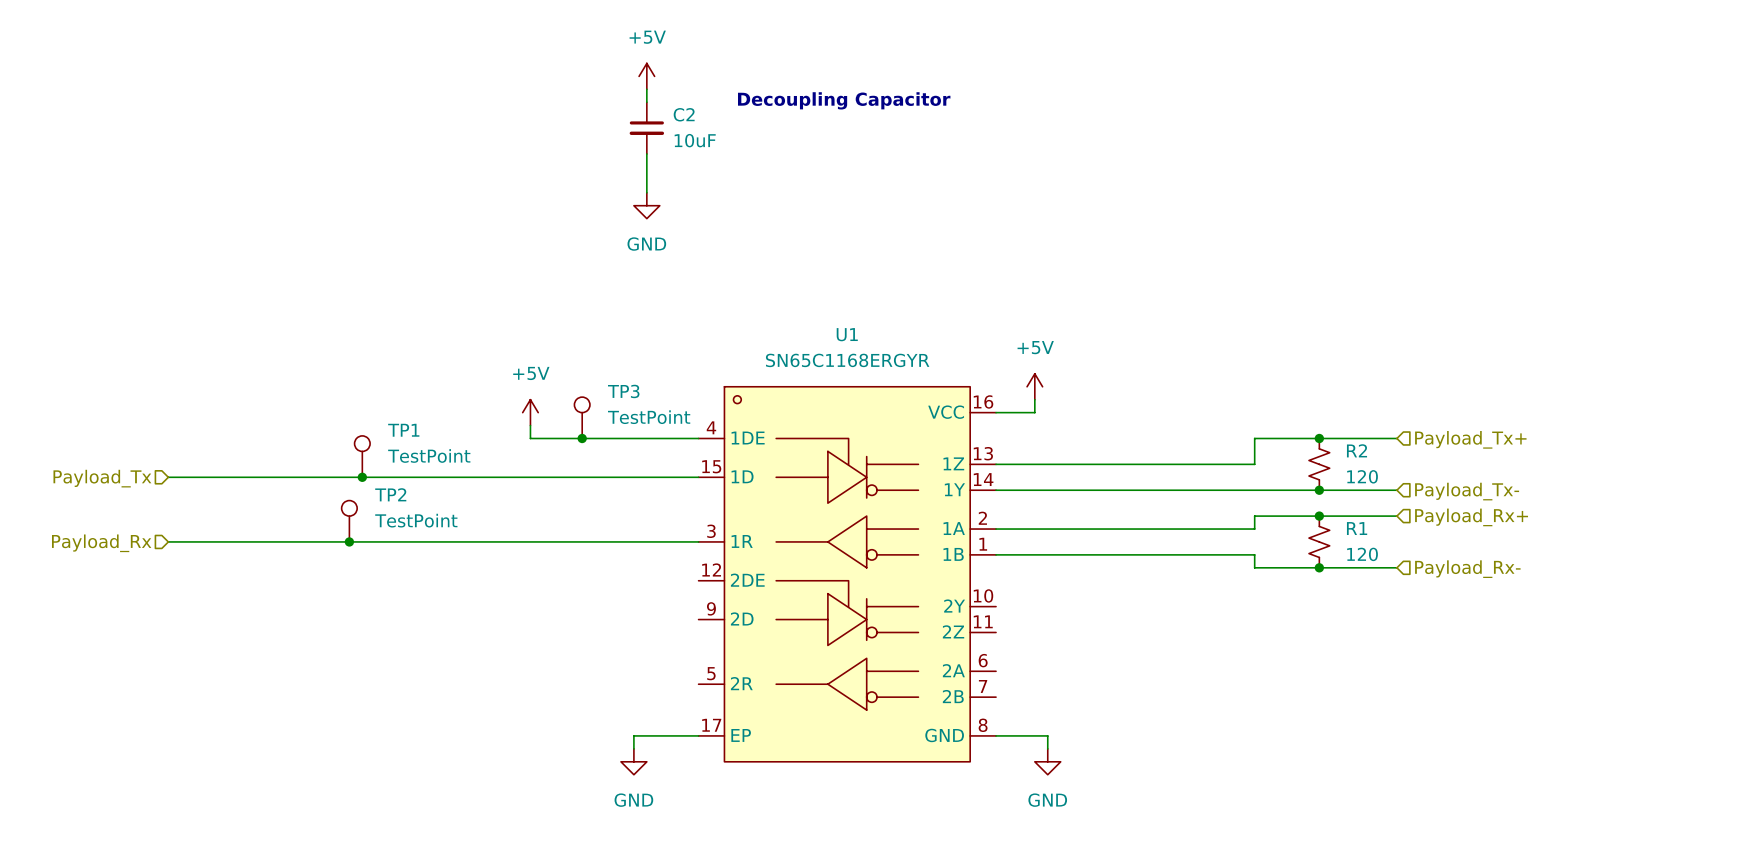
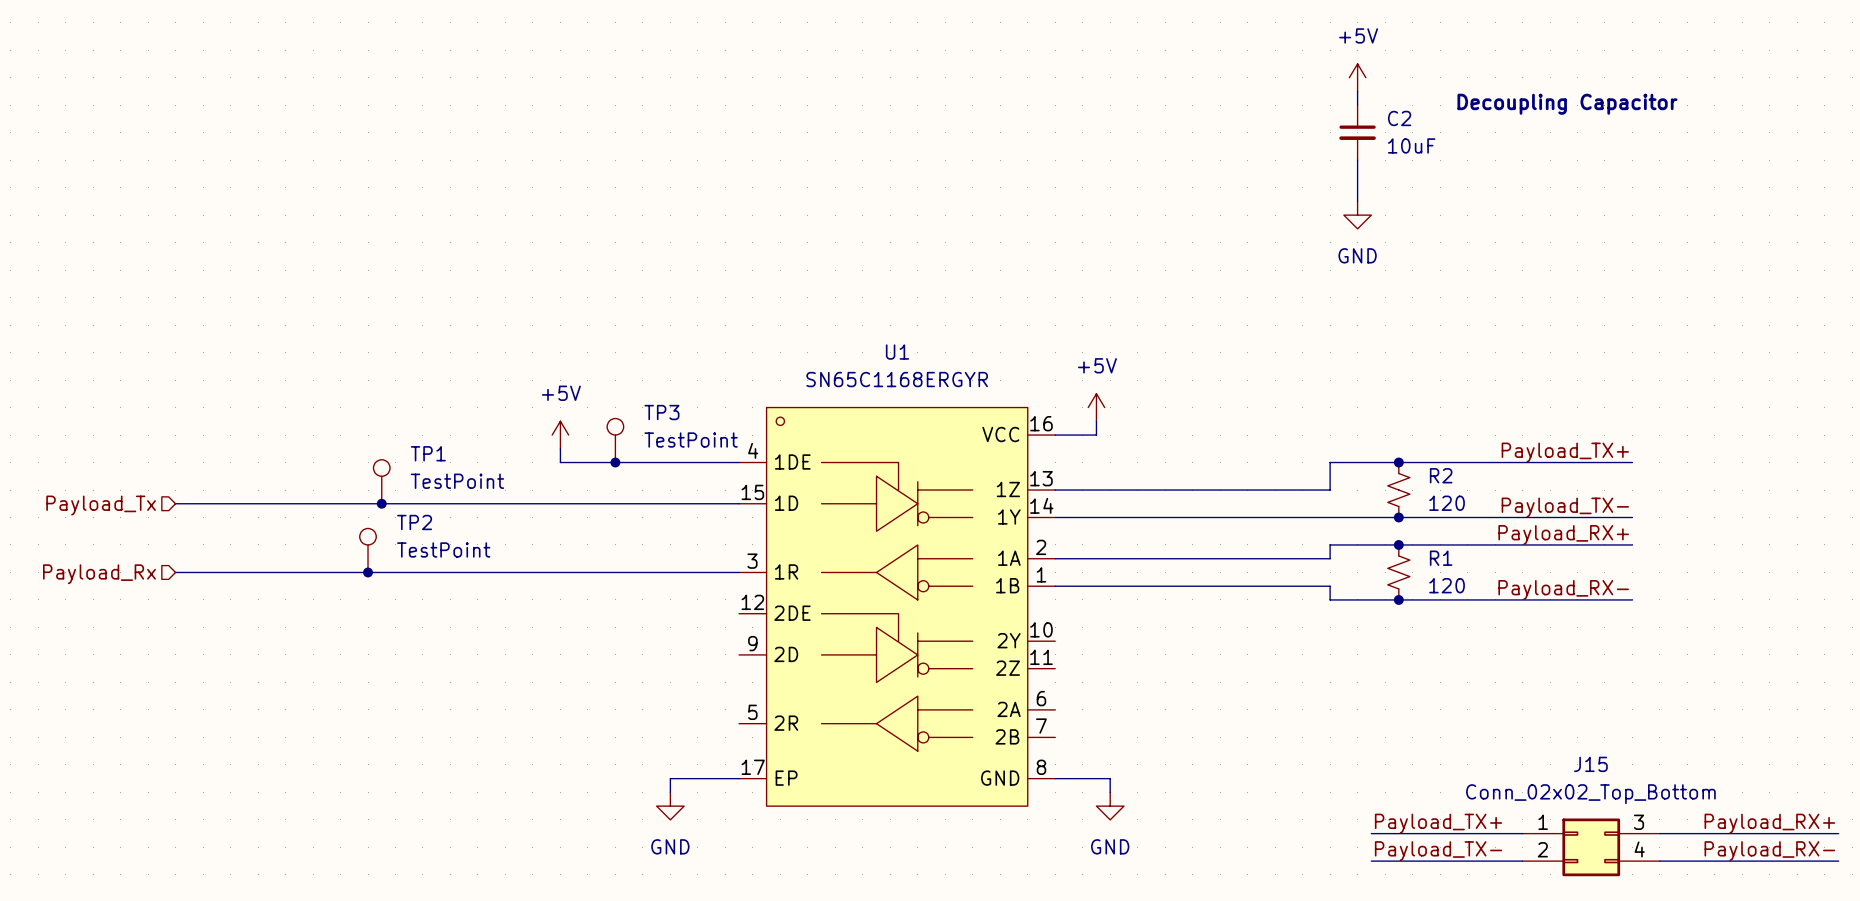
power symbol: +5V (646, 76) -> none
power symbol: none -> +5V (1357, 77)
wire: (646, 89) (646, 102) -> none
wire: none -> (1357, 91) (1357, 105)
text: Decoupling Capacitor (844, 100) -> none
text: none -> Decoupling Capacitor (1567, 104)
C2 position: (646, 128) -> (1357, 132)
wire: (646, 153) (646, 192) -> none
wire: none -> (1357, 160) (1357, 201)
power symbol: GND (646, 205) -> none
power symbol: none -> GND (1357, 215)
label: none -> Payload_TX+ (1565, 452)
wire: none -> (1481, 462) (1632, 462)
hierarchical label: Payload_Tx+ (1470, 439) -> none
label: none -> Payload_TX- (1565, 507)
wire: none -> (1481, 517) (1632, 517)
hierarchical label: Payload_Tx- (1467, 491) -> none
label: none -> Payload_RX+ (1563, 535)
wire: none -> (1481, 544) (1632, 544)
hierarchical label: Payload_Rx+ (1471, 517) -> none
label: none -> Payload_RX- (1563, 589)
wire: none -> (1481, 599) (1632, 599)
hierarchical label: Payload_Rx- (1467, 569) -> none
label: none -> Payload_TX+ (1438, 823)
label: none -> Payload_RX+ (1769, 823)
wire: none -> (1371, 833) (1522, 833)
wire: none -> (1659, 833) (1838, 833)
J15: none -> Conn_02x02_Top_Bottom (1591, 847)
label: none -> Payload_TX- (1438, 851)
label: none -> Payload_RX- (1769, 851)
wire: none -> (1371, 861) (1522, 861)
wire: none -> (1659, 861) (1838, 861)

